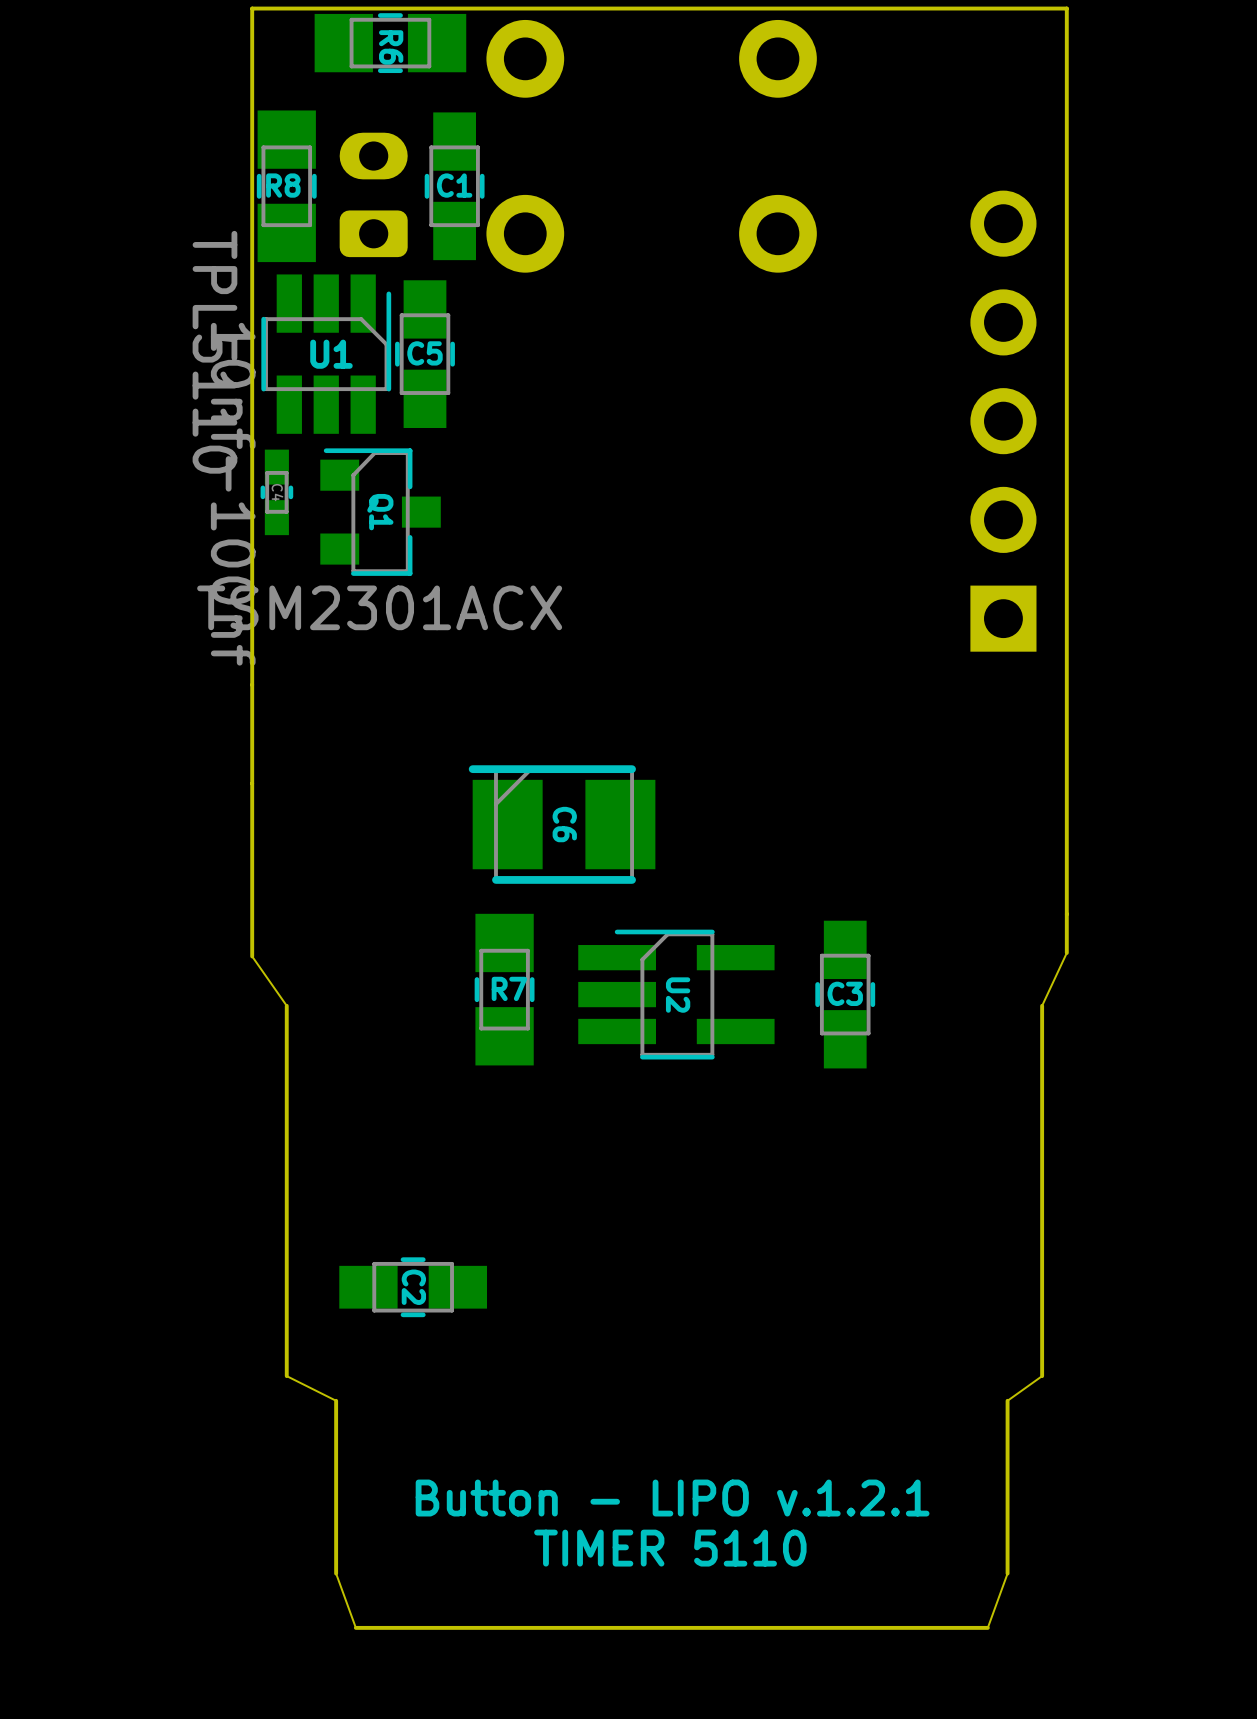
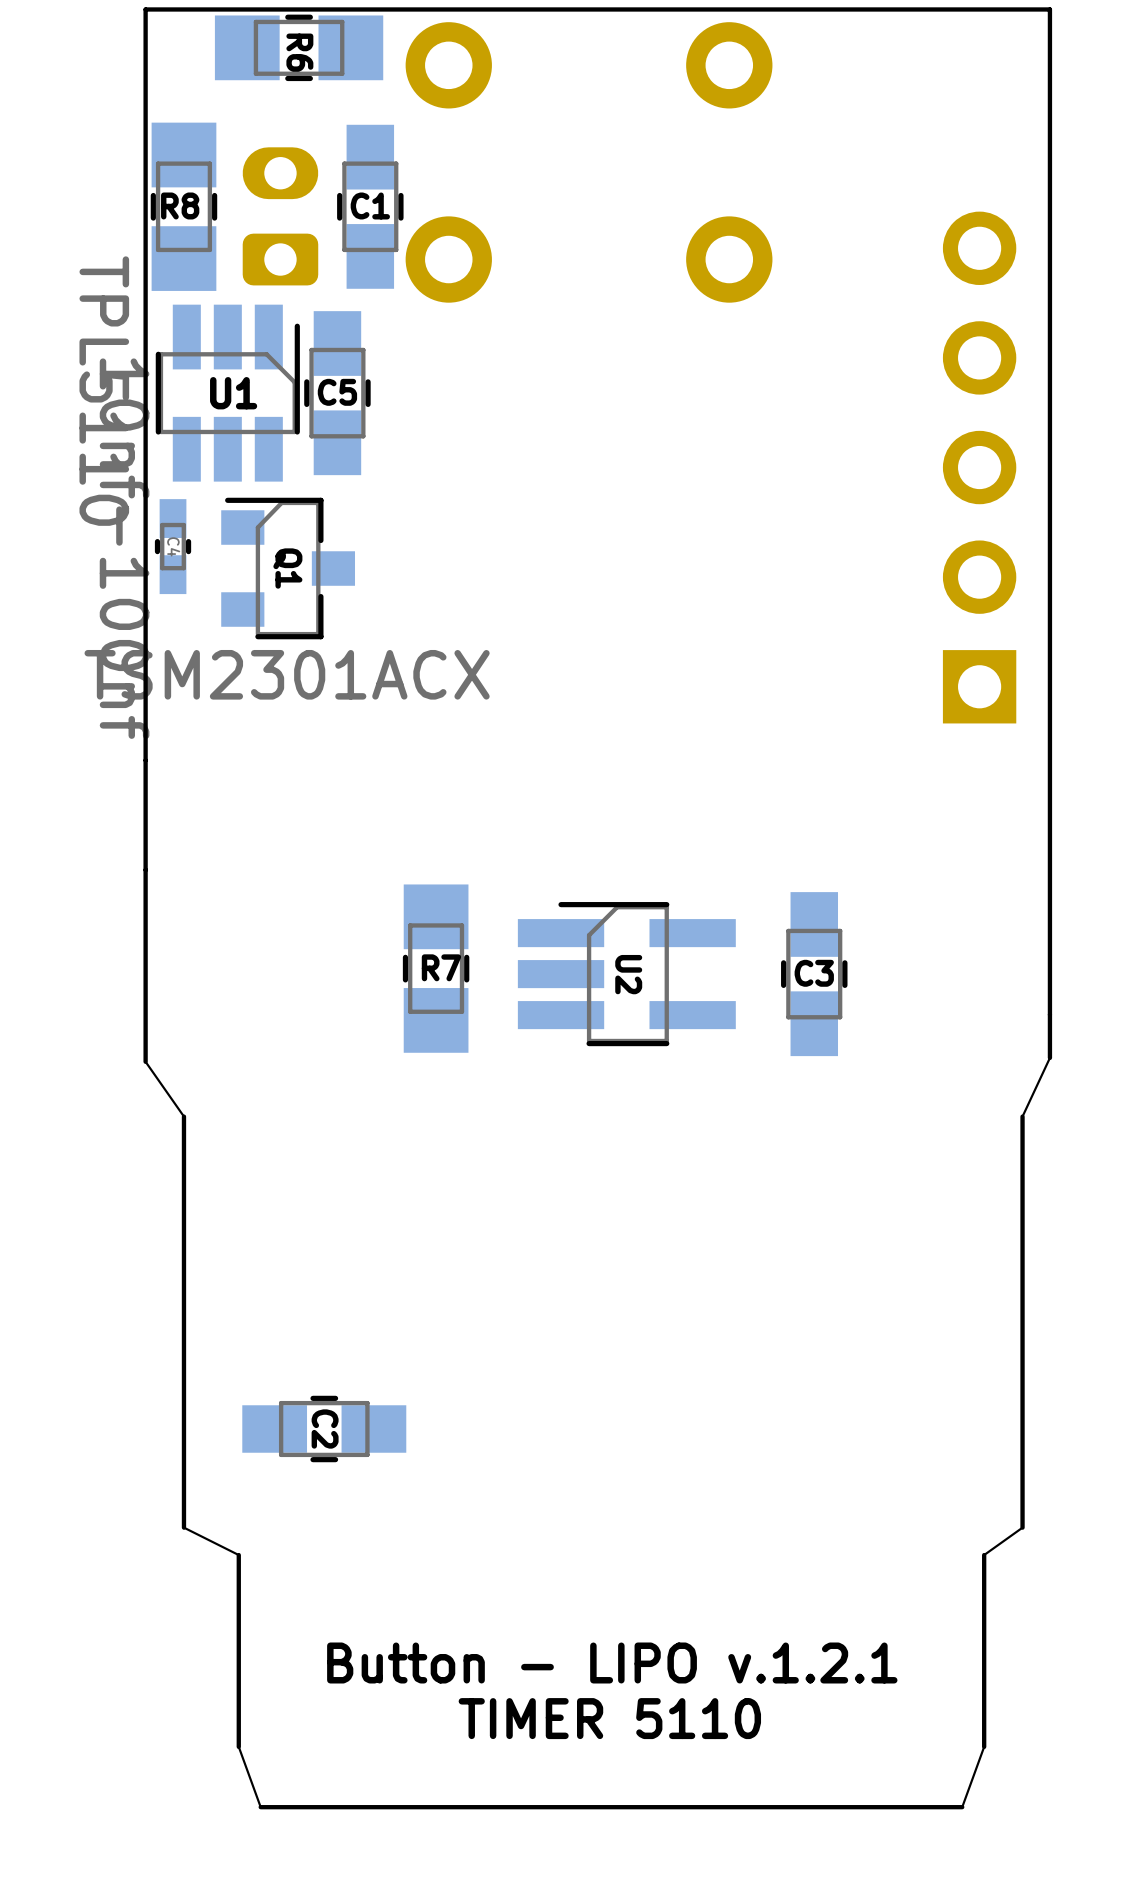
C6: (562, 824) -> none
R7 position: (504, 989) -> (436, 968)
U2 position: (676, 994) -> (626, 974)
C3 position: (845, 994) -> (814, 974)

